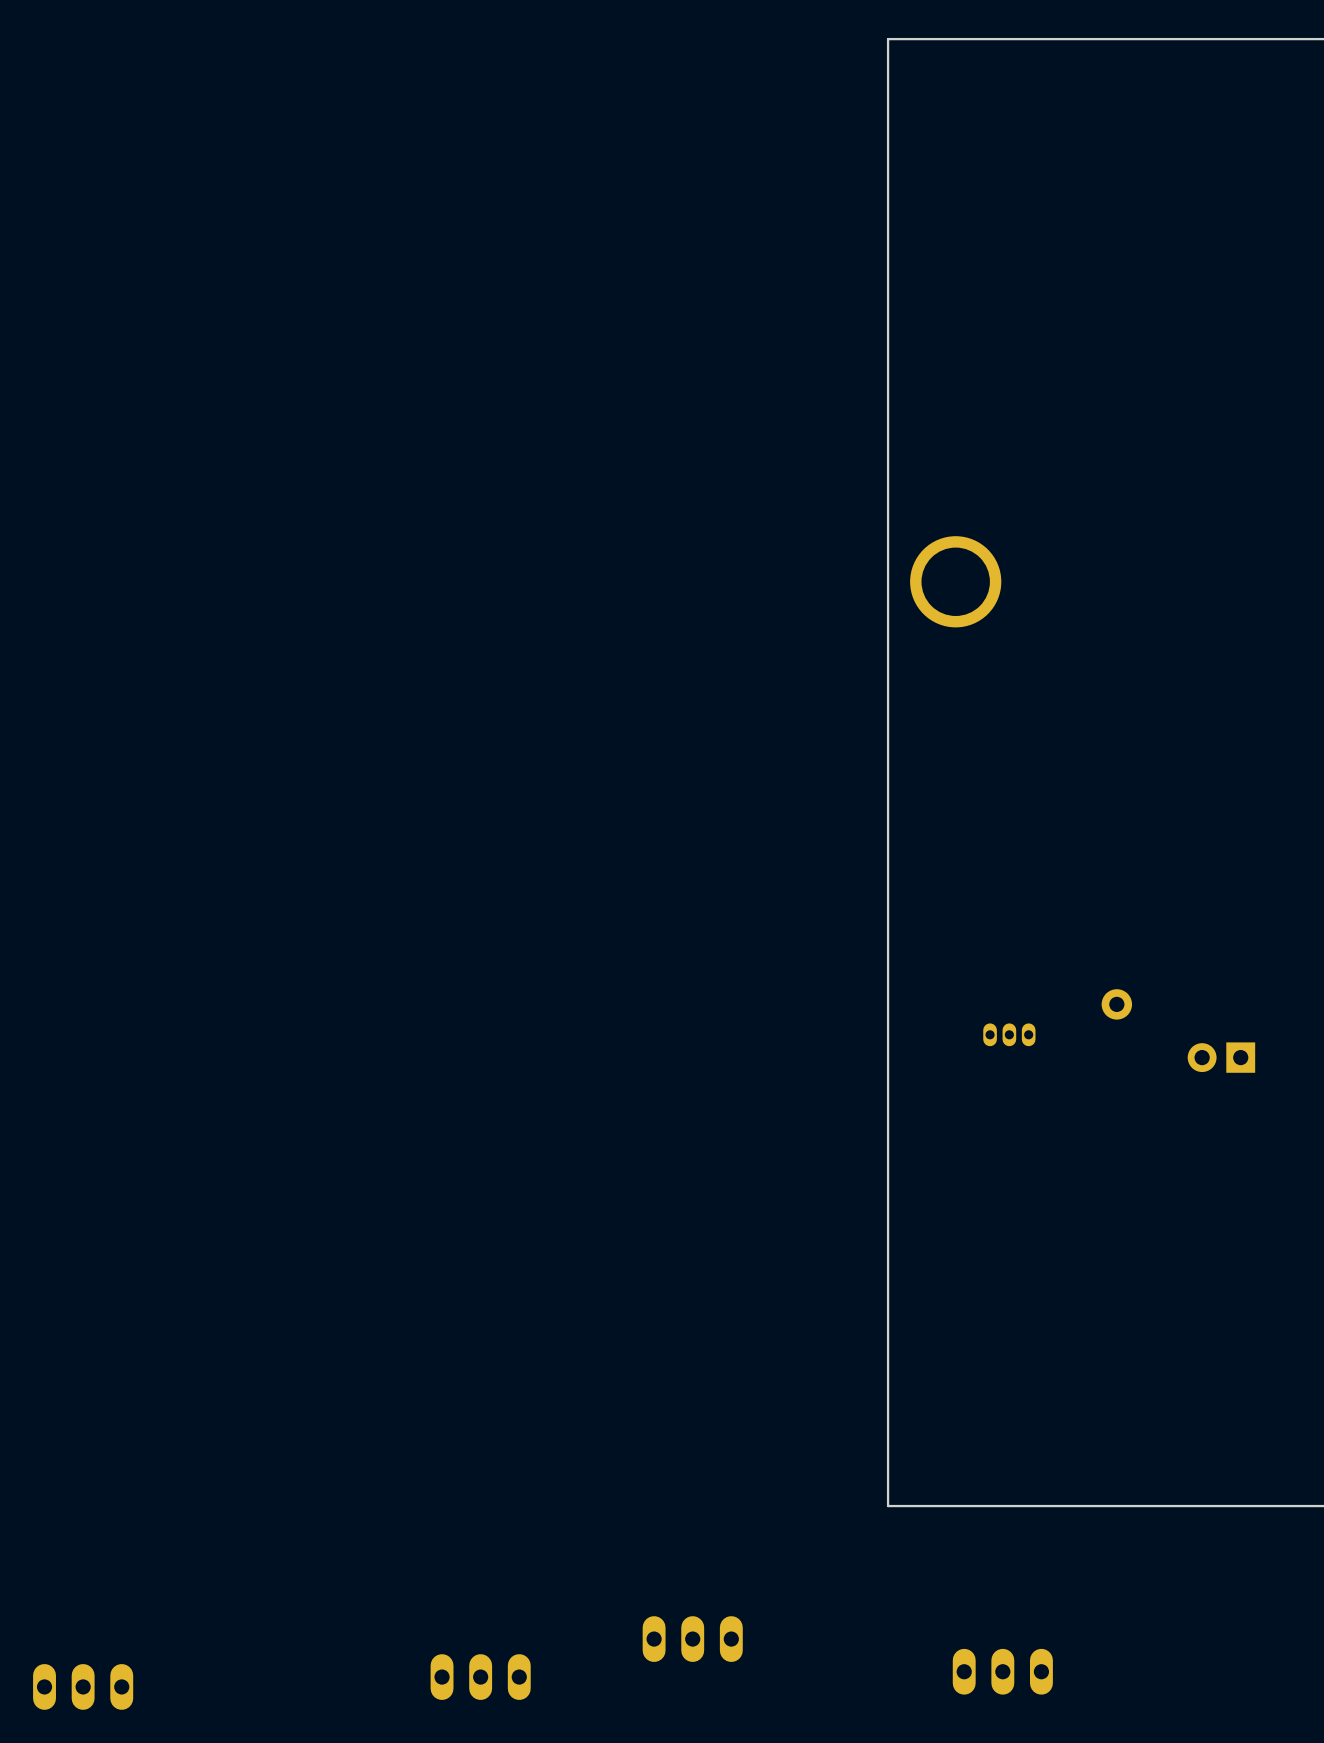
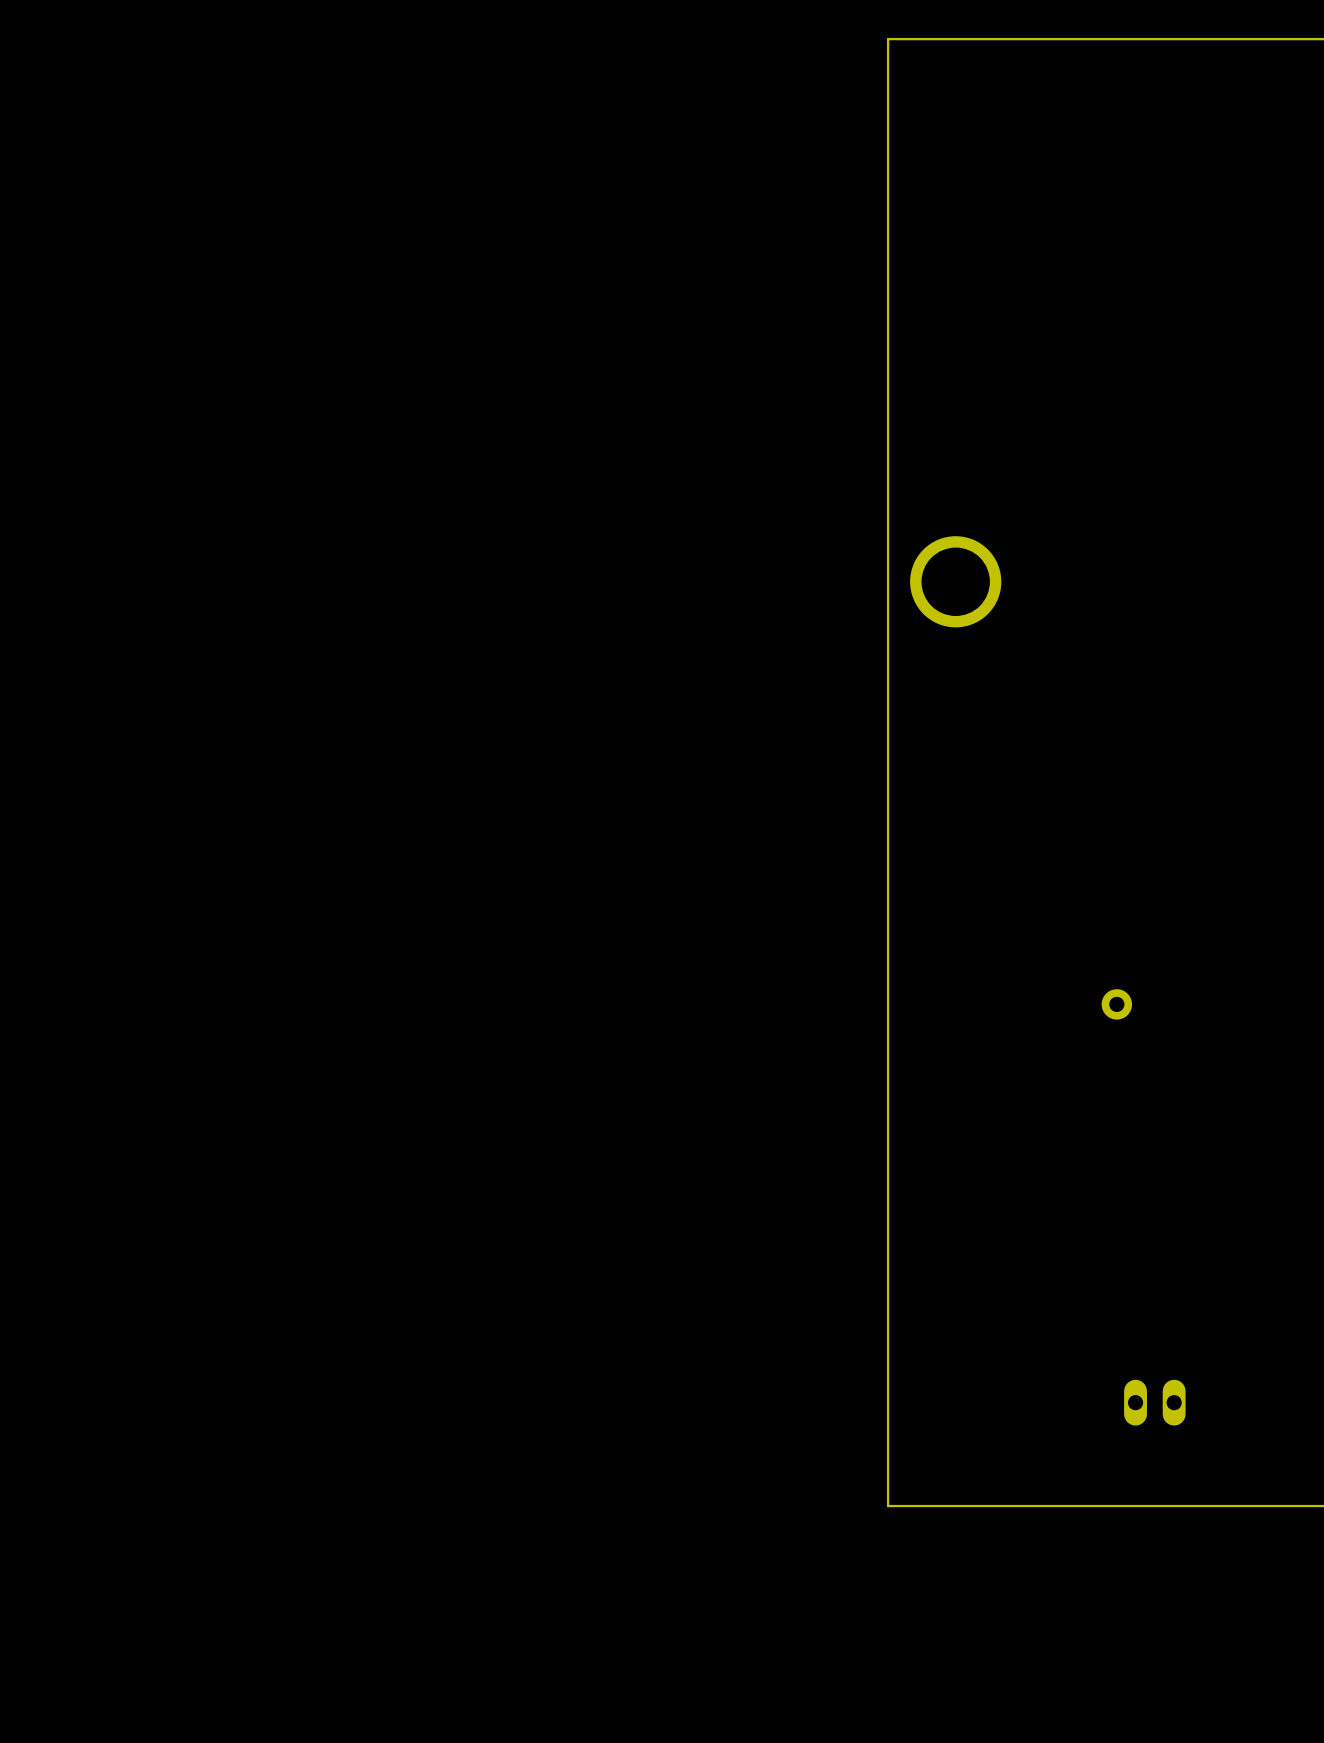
part: (1009, 1034) -> none
part: (1221, 1057) -> none
part: none -> (1154, 1402)
part: (692, 1639) -> none
part: (1002, 1671) -> none
part: (480, 1677) -> none
part: (83, 1686) -> none

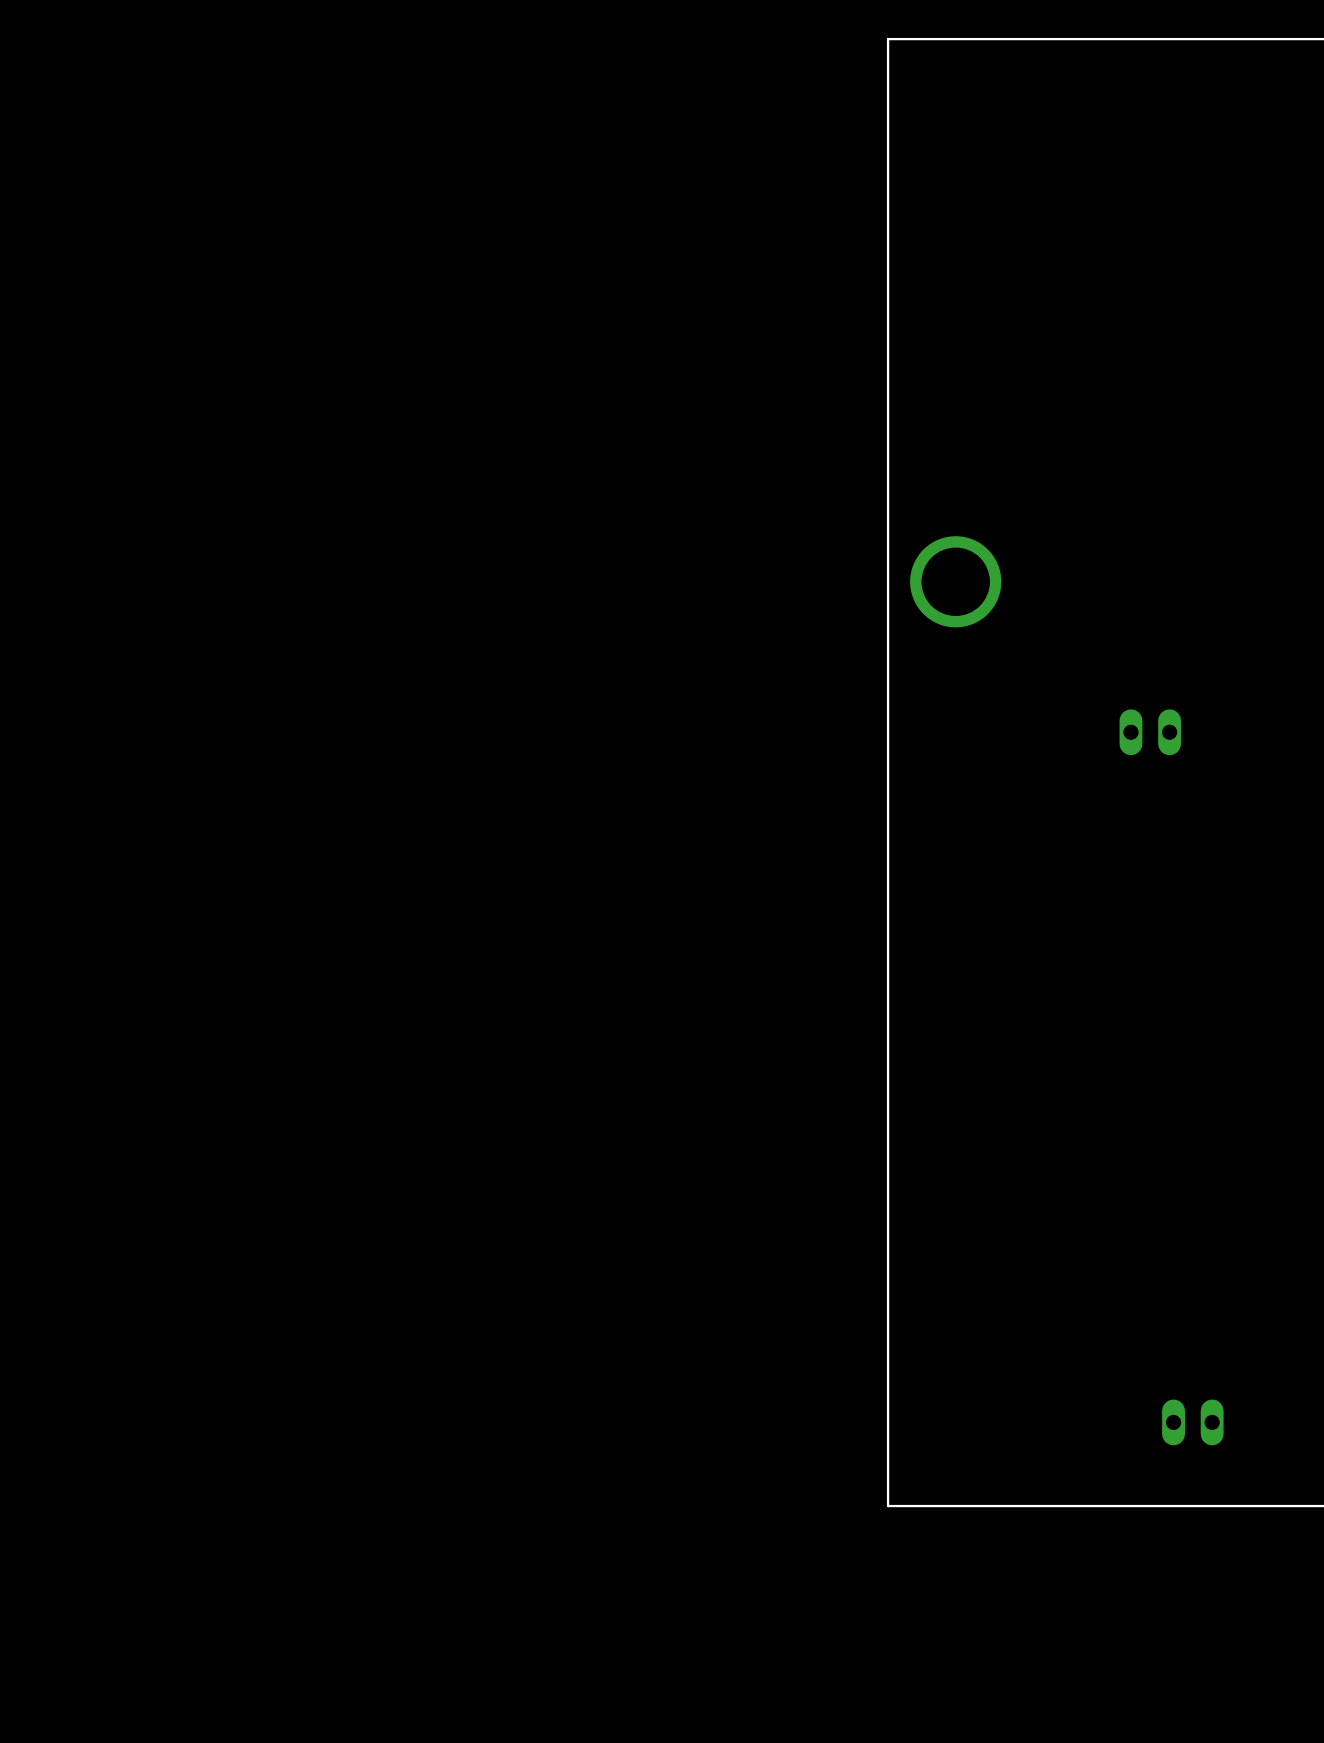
part: none -> (1150, 732)
part: (1116, 1004) -> none
part position: (1154, 1402) -> (1192, 1422)

